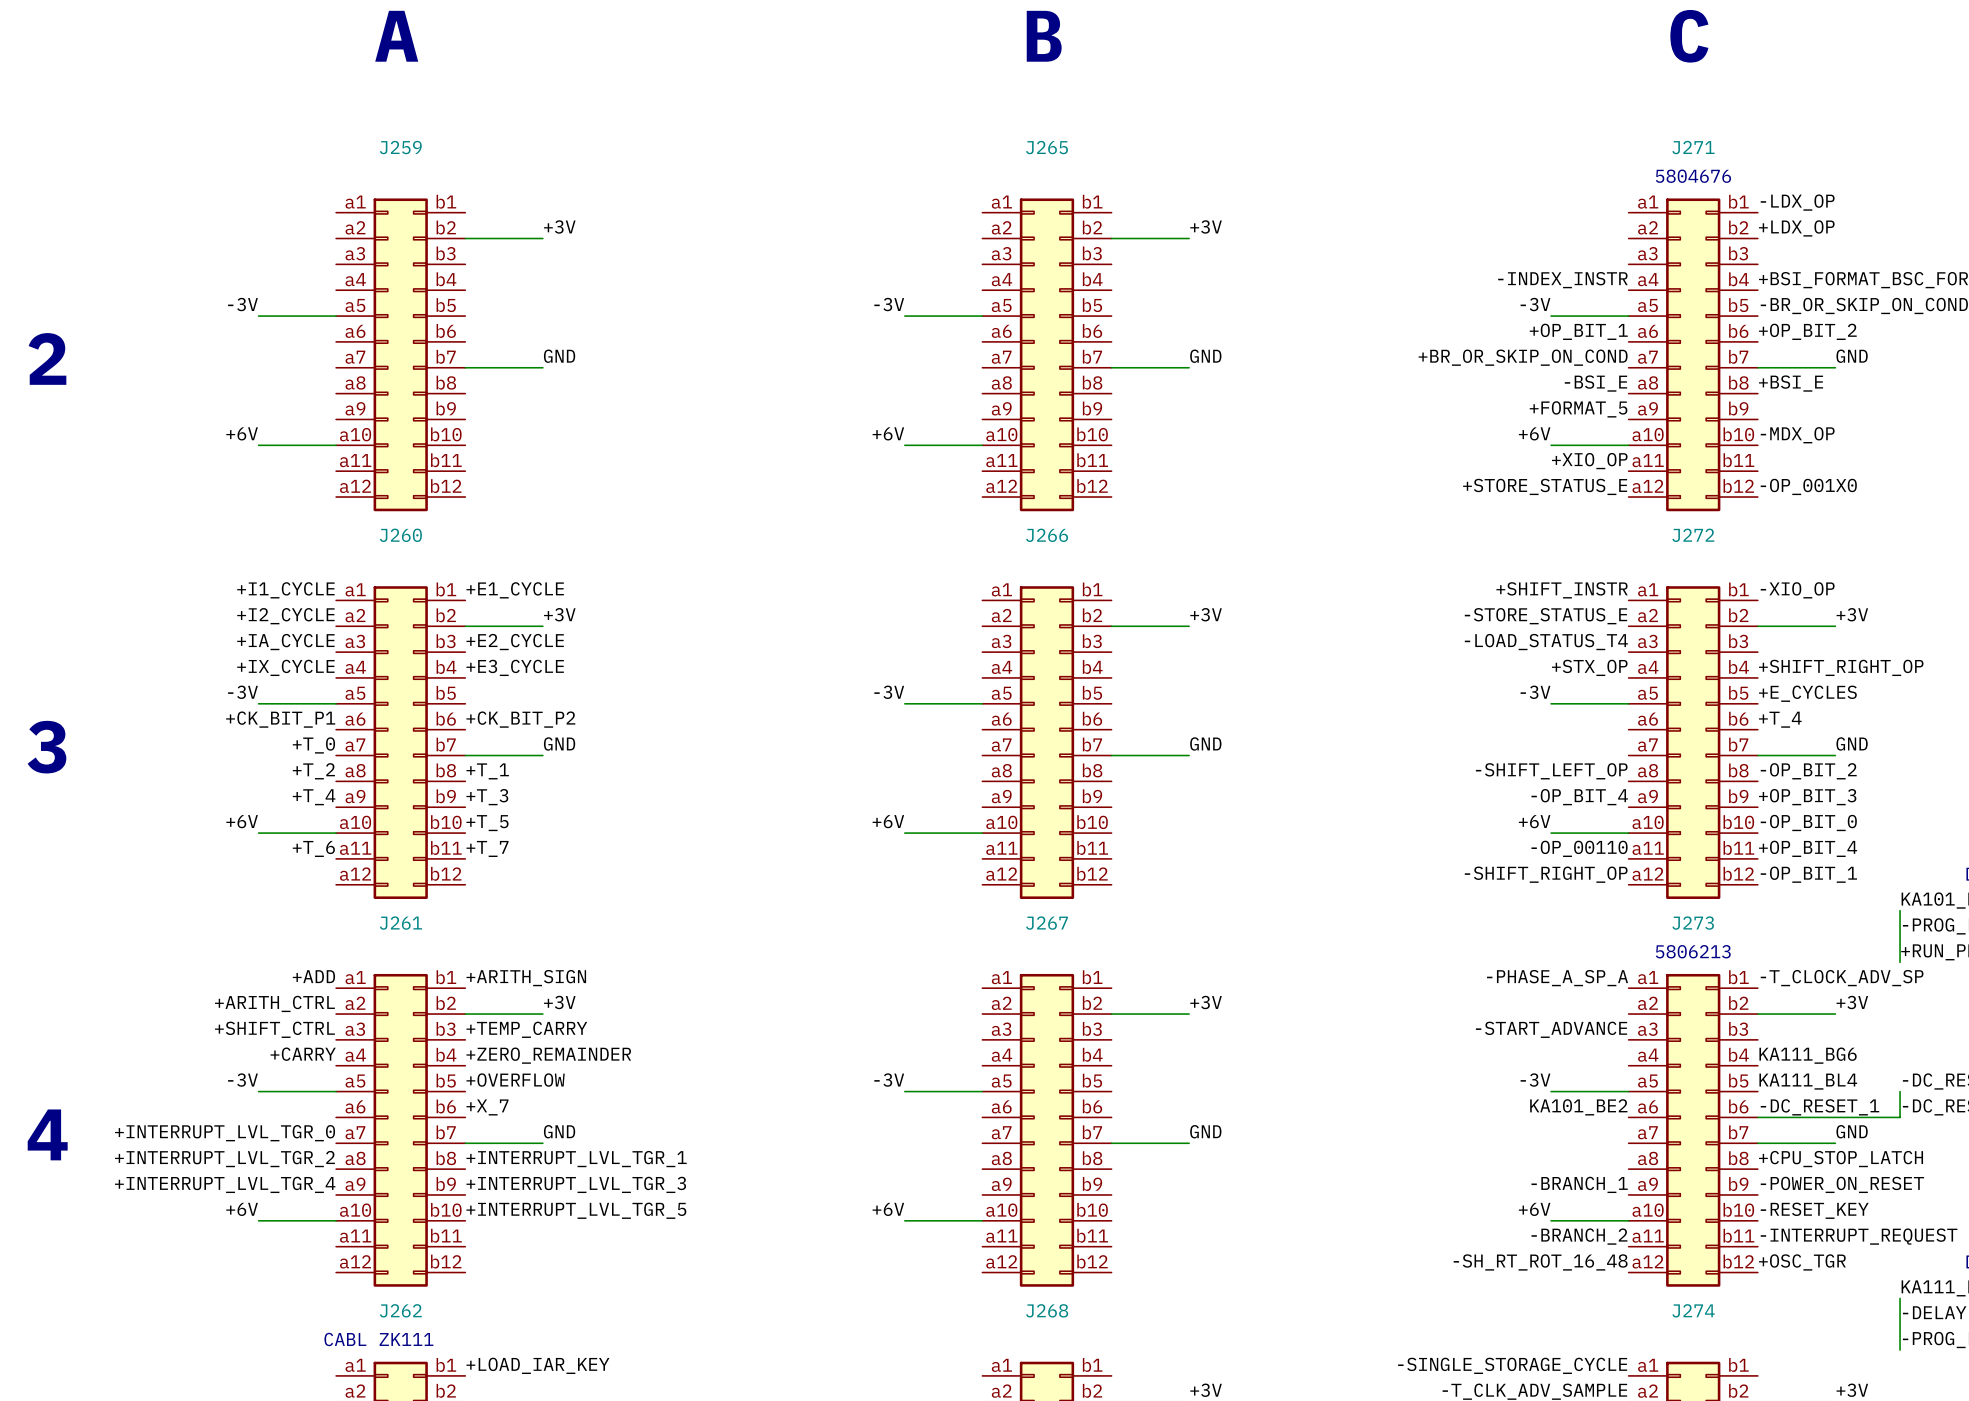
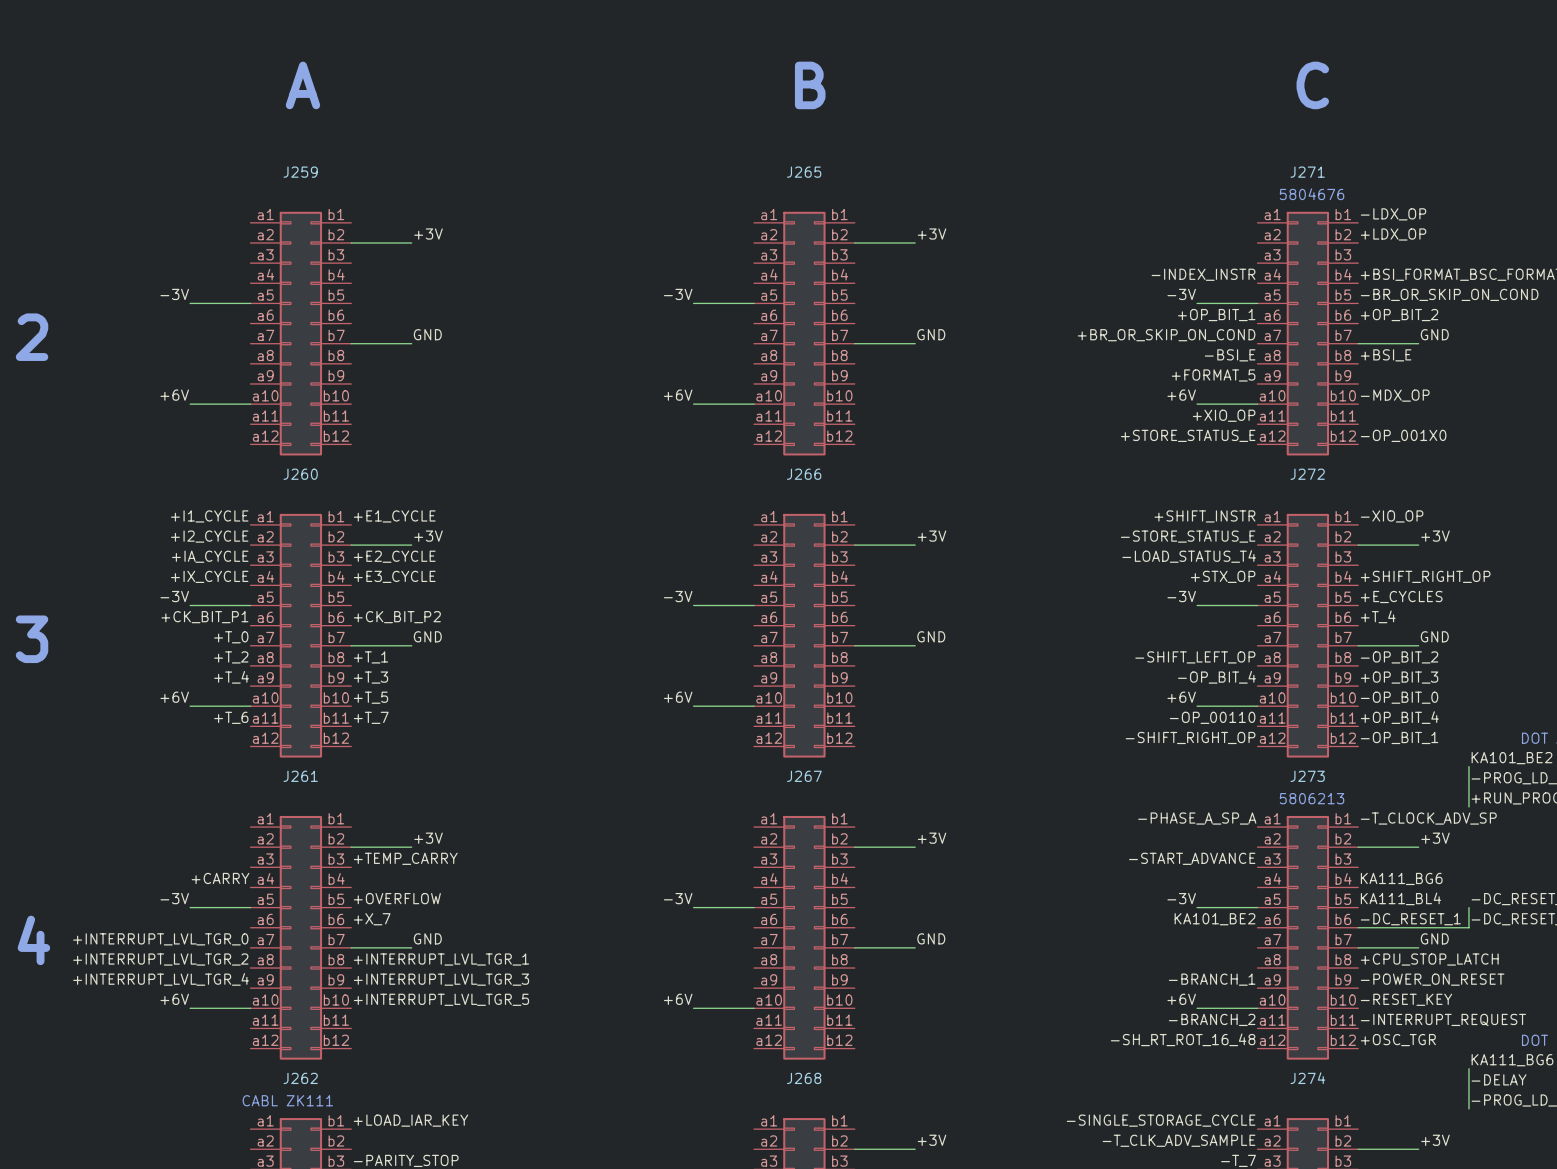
label: +ADD (313, 976) -> none
label: +ARITH_SIGN (526, 978) -> none
label: +ARITH_CTRL (274, 1003) -> none
label: +SHIFT_CTRL (274, 1029) -> none
label: +ZERO_REMAINDER (548, 1055) -> none

